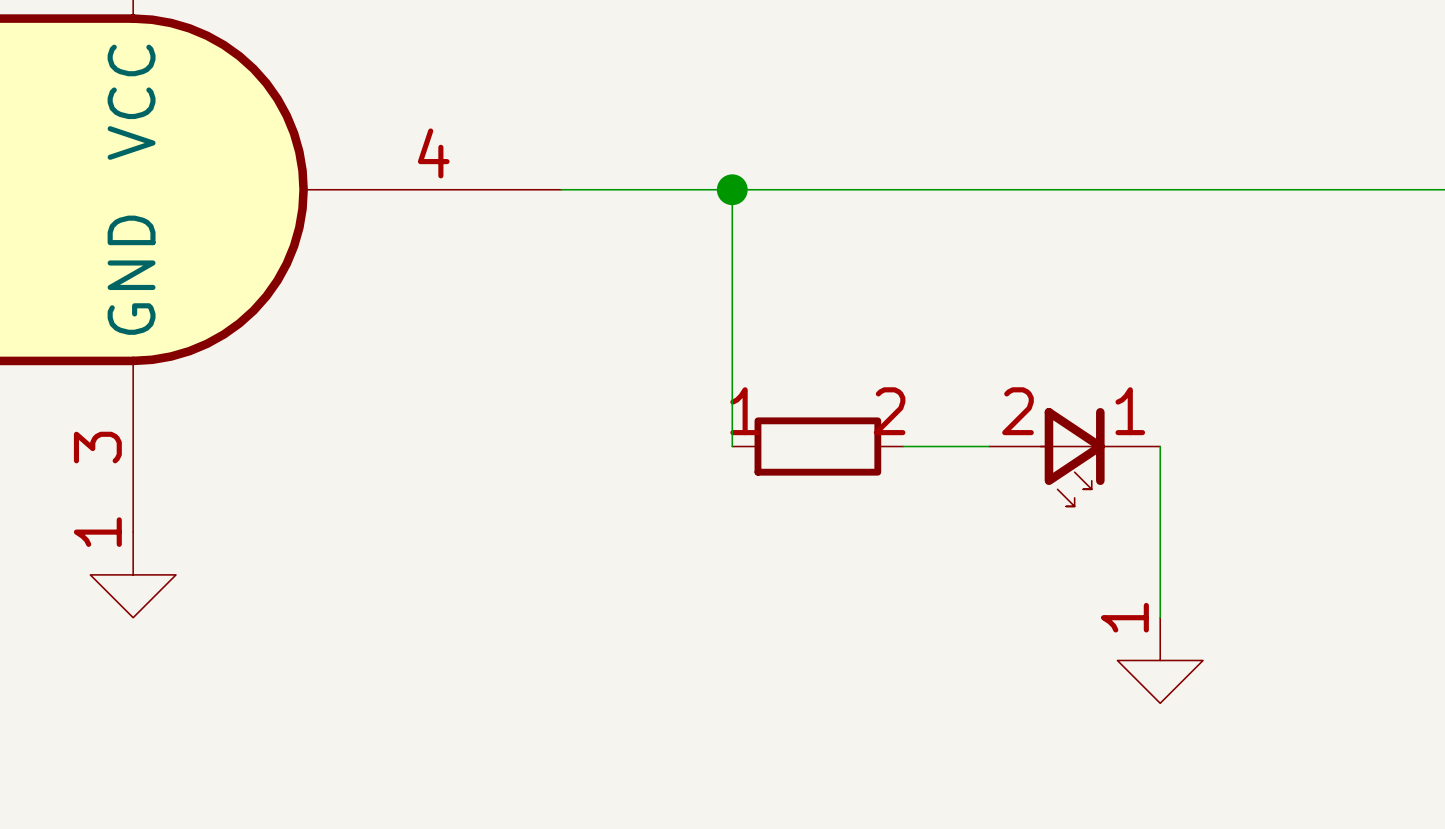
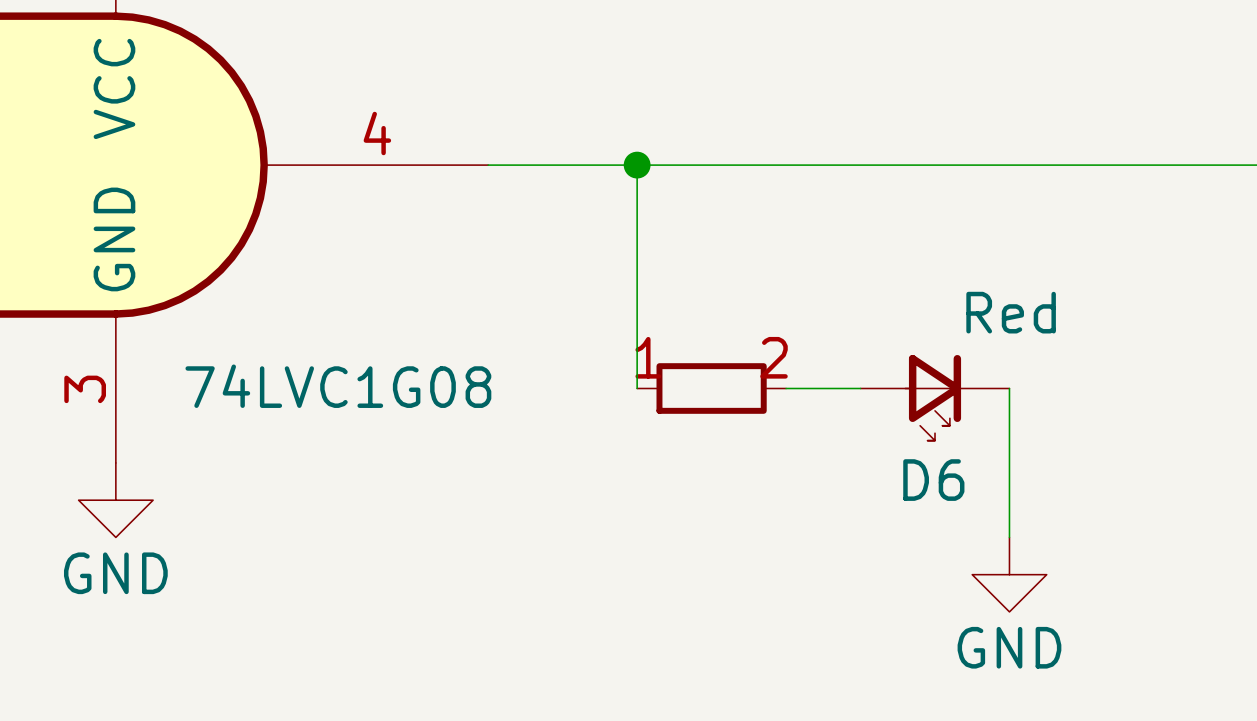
D6 value: none -> Red (1011, 312)
D6 pin number: 2 (1017, 411) -> none
D6 pin number: 1 (1130, 411) -> none
part value: none -> 74LVC1G08 (338, 386)
power symbol pin number: 1 (97, 532) -> none
D6 name: none -> D6 (933, 480)
power symbol pin number: 1 (1124, 617) -> none
power symbol text: none -> GND (115, 573)
power symbol text: none -> GND (1009, 647)

